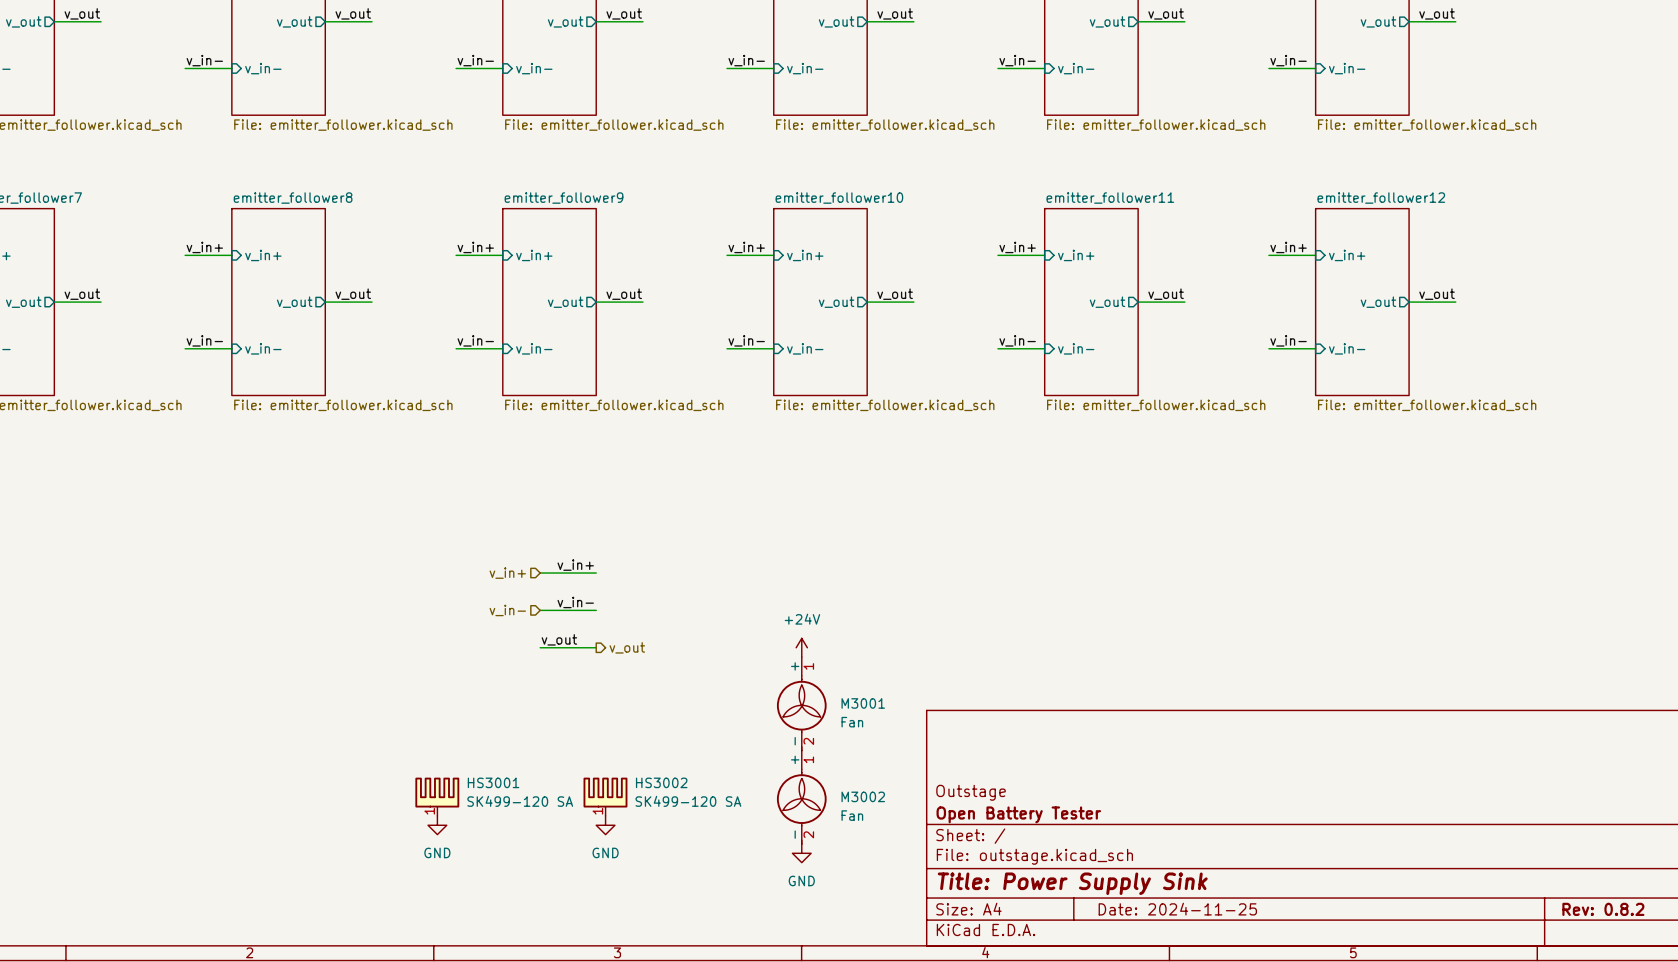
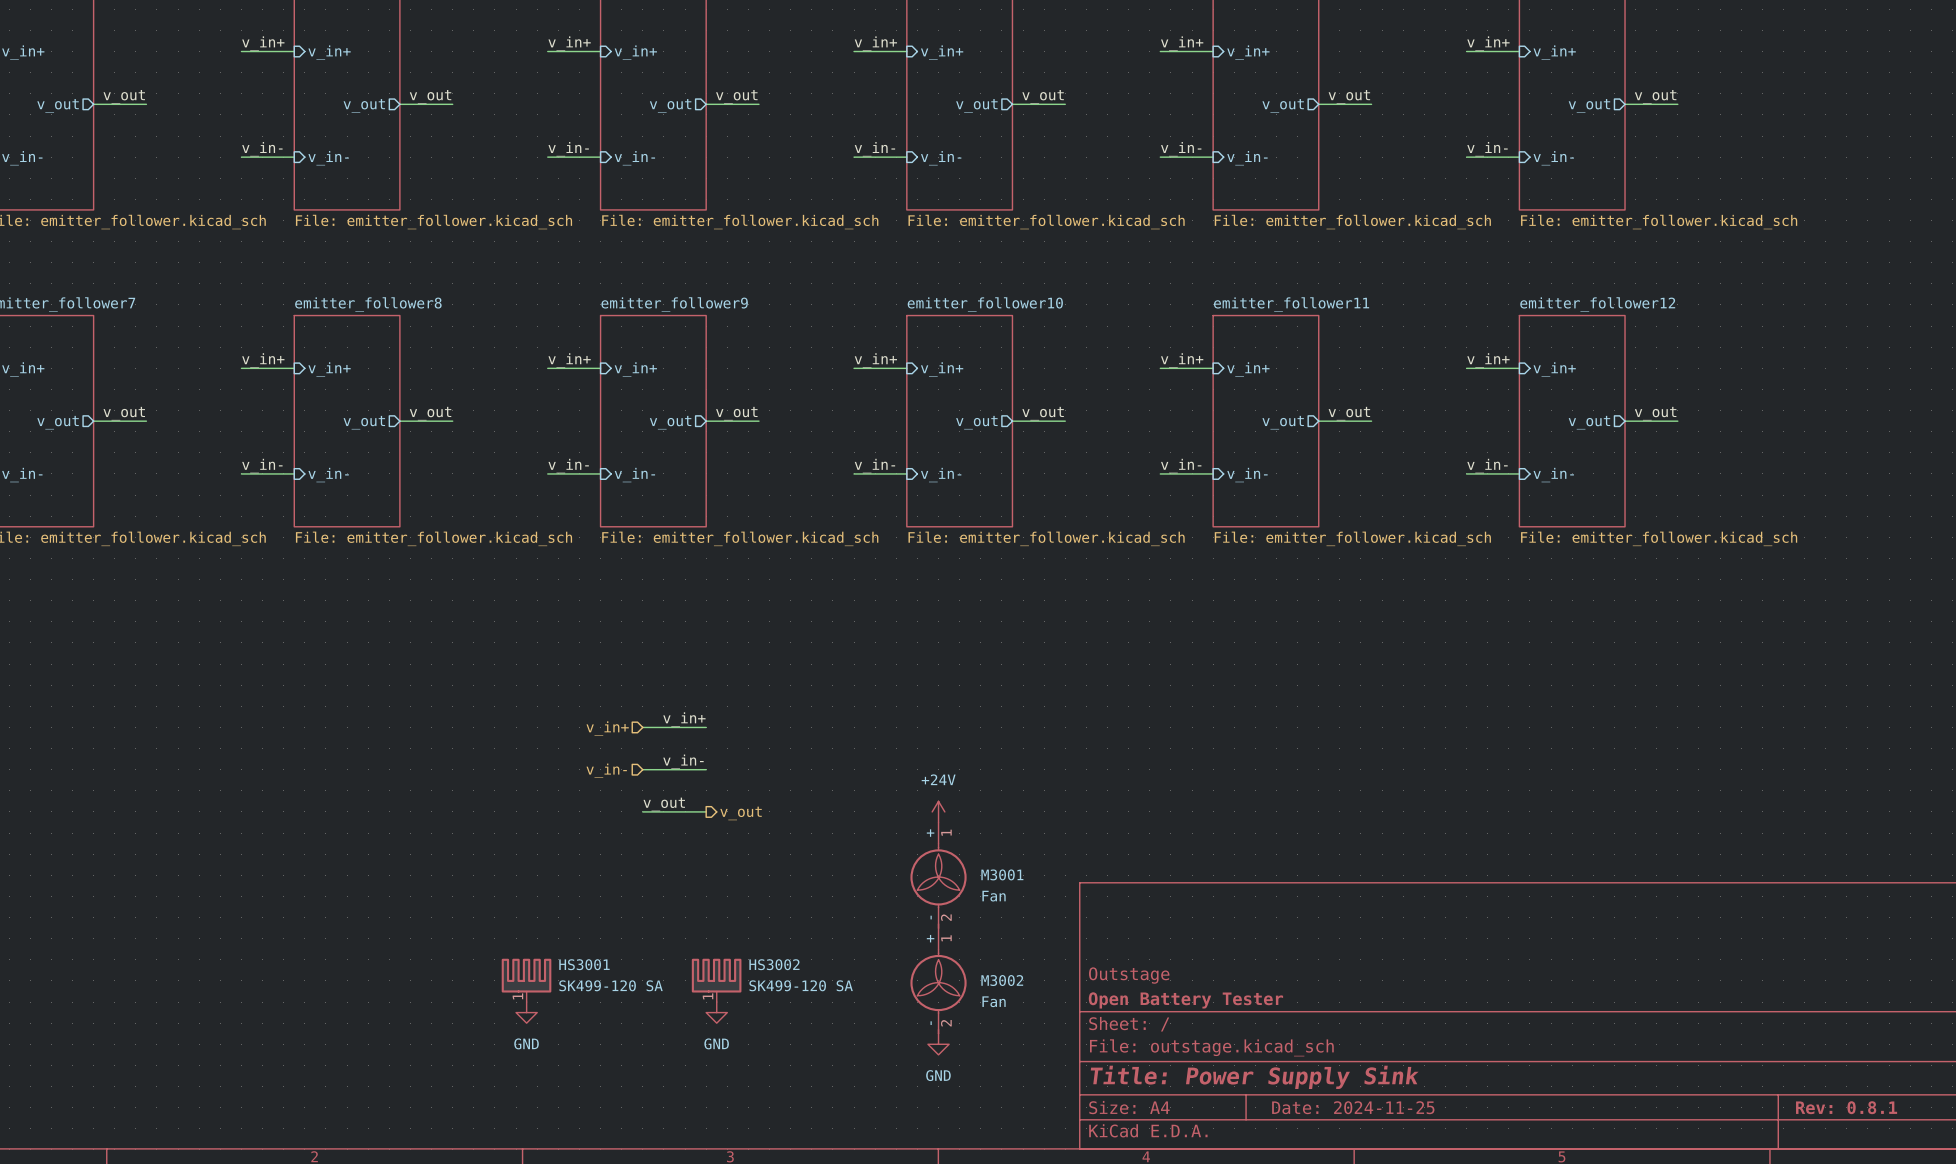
title block: Rev: 0.8.2 (1603, 909) -> Rev: 0.8.1 (1846, 1107)

